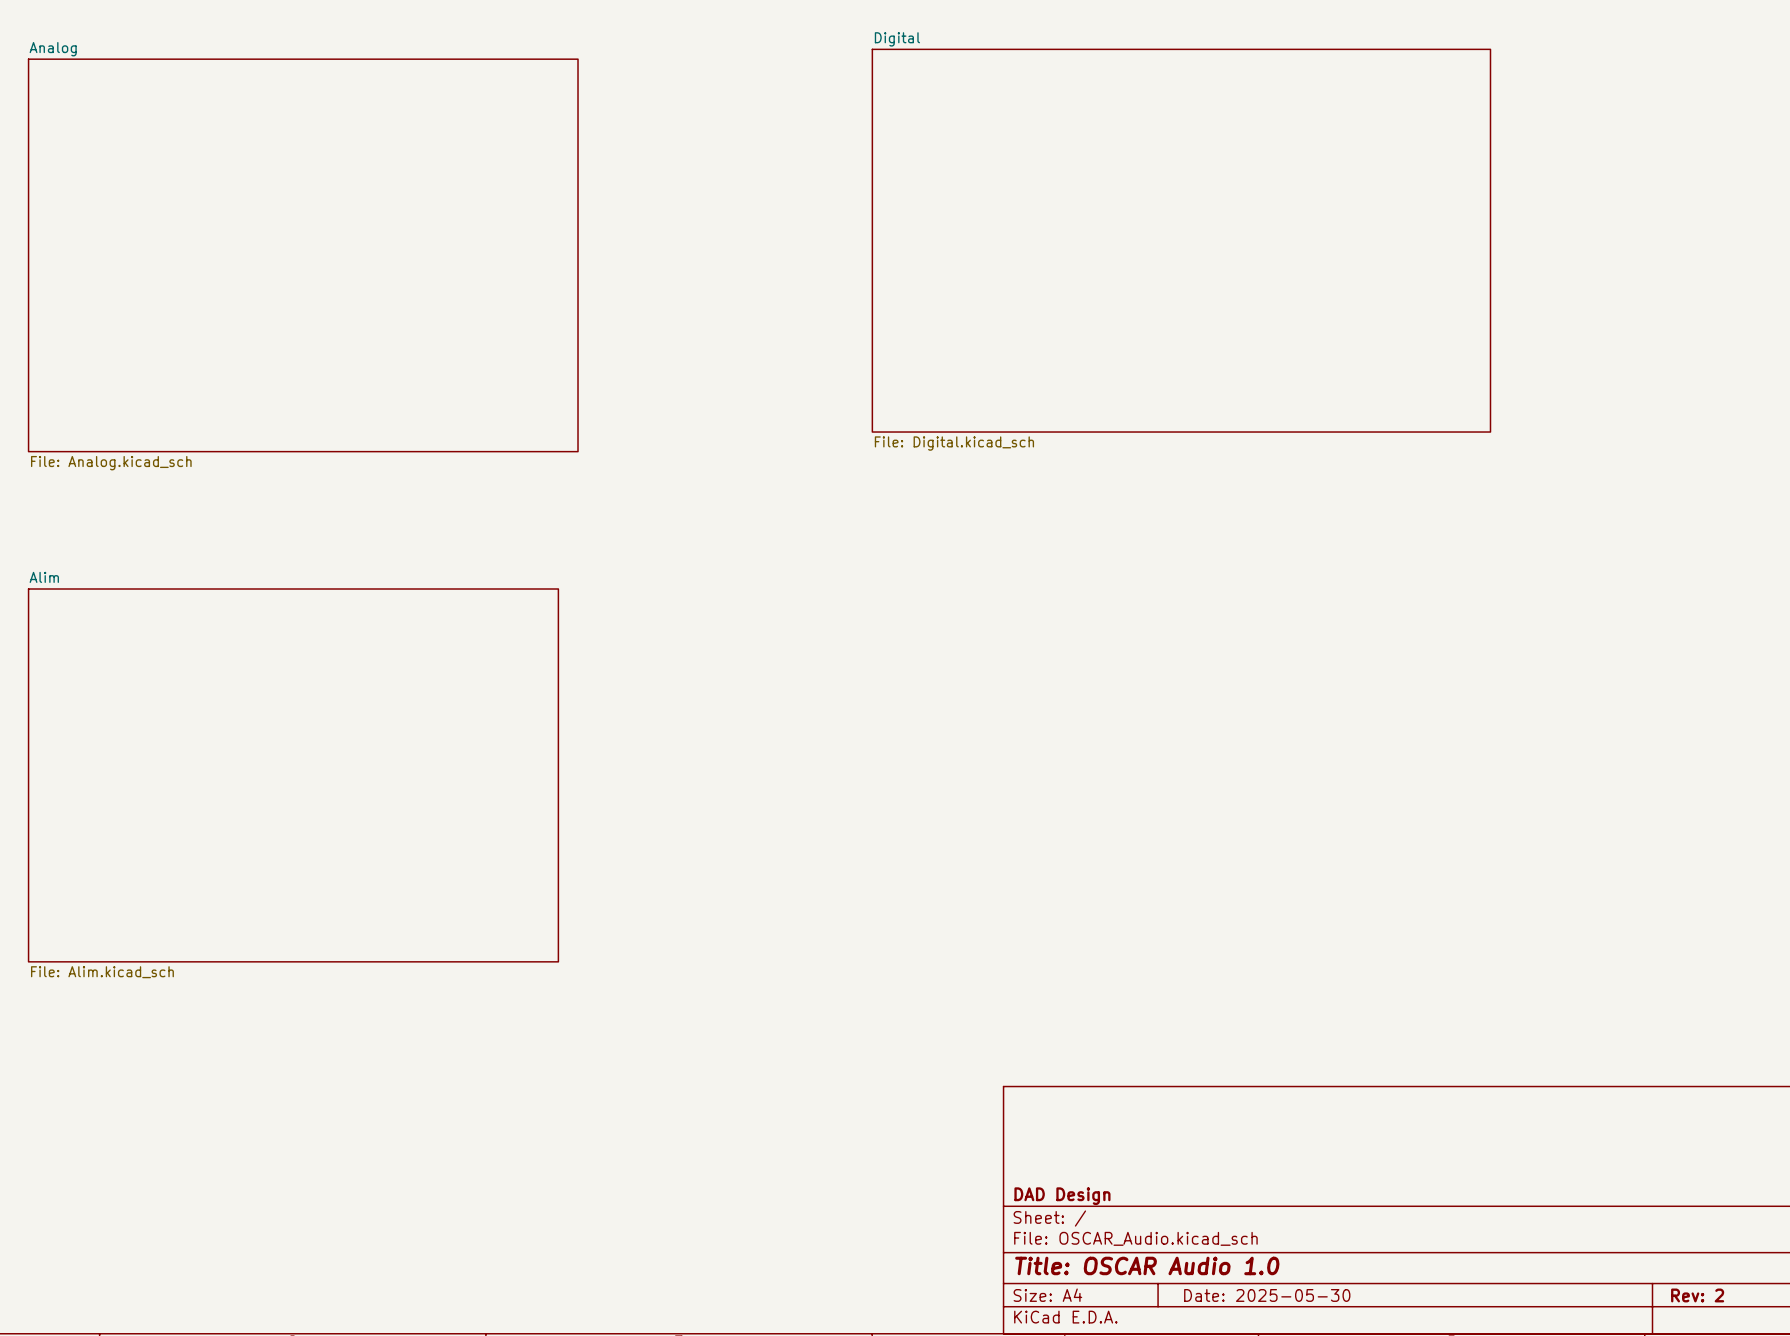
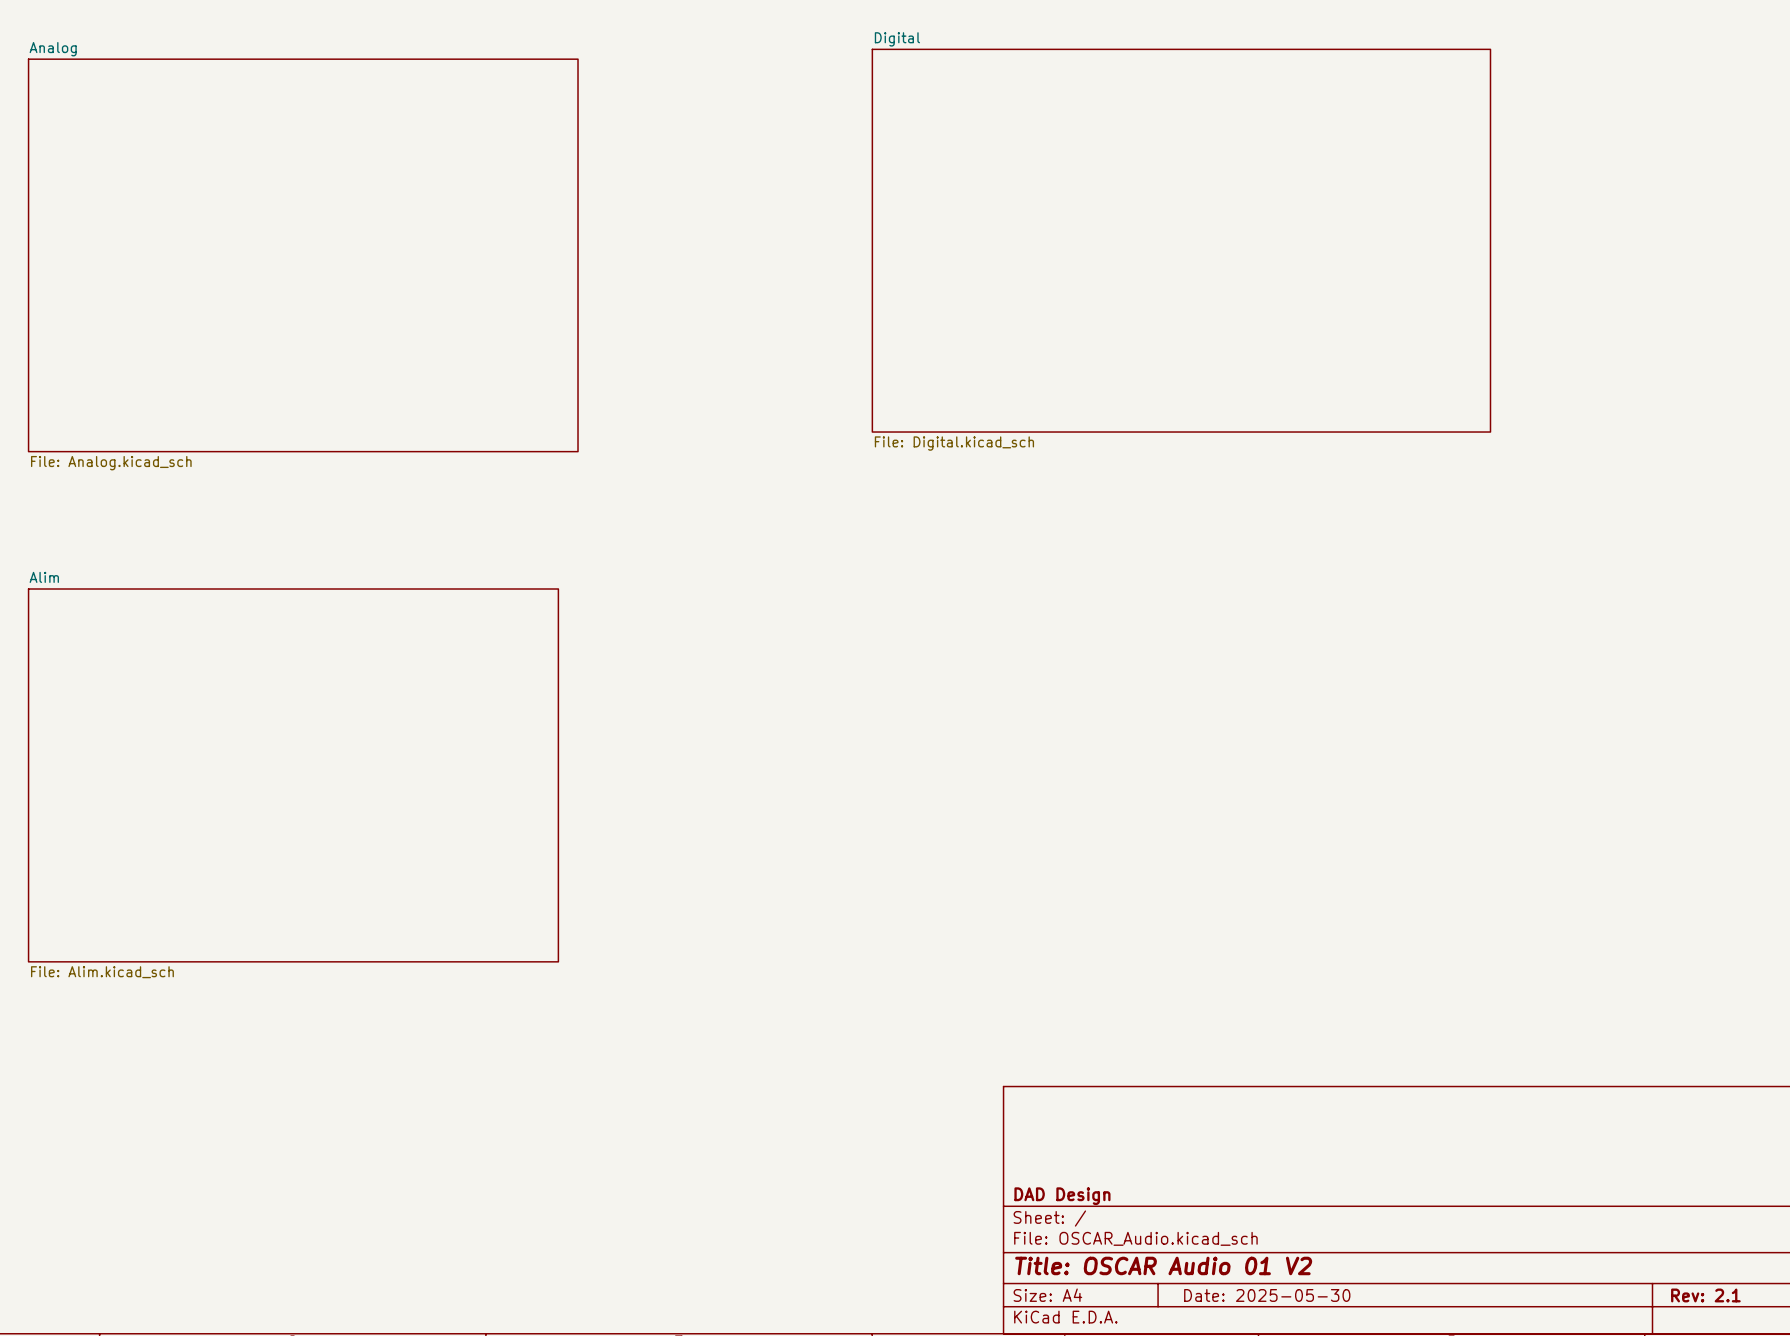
title block: Title: OSCAR Audio 1.0 (1147, 1265) -> Title: OSCAR Audio 01 V2 (1163, 1265)
title block: Rev: 2 (1697, 1295) -> Rev: 2.1 (1705, 1295)

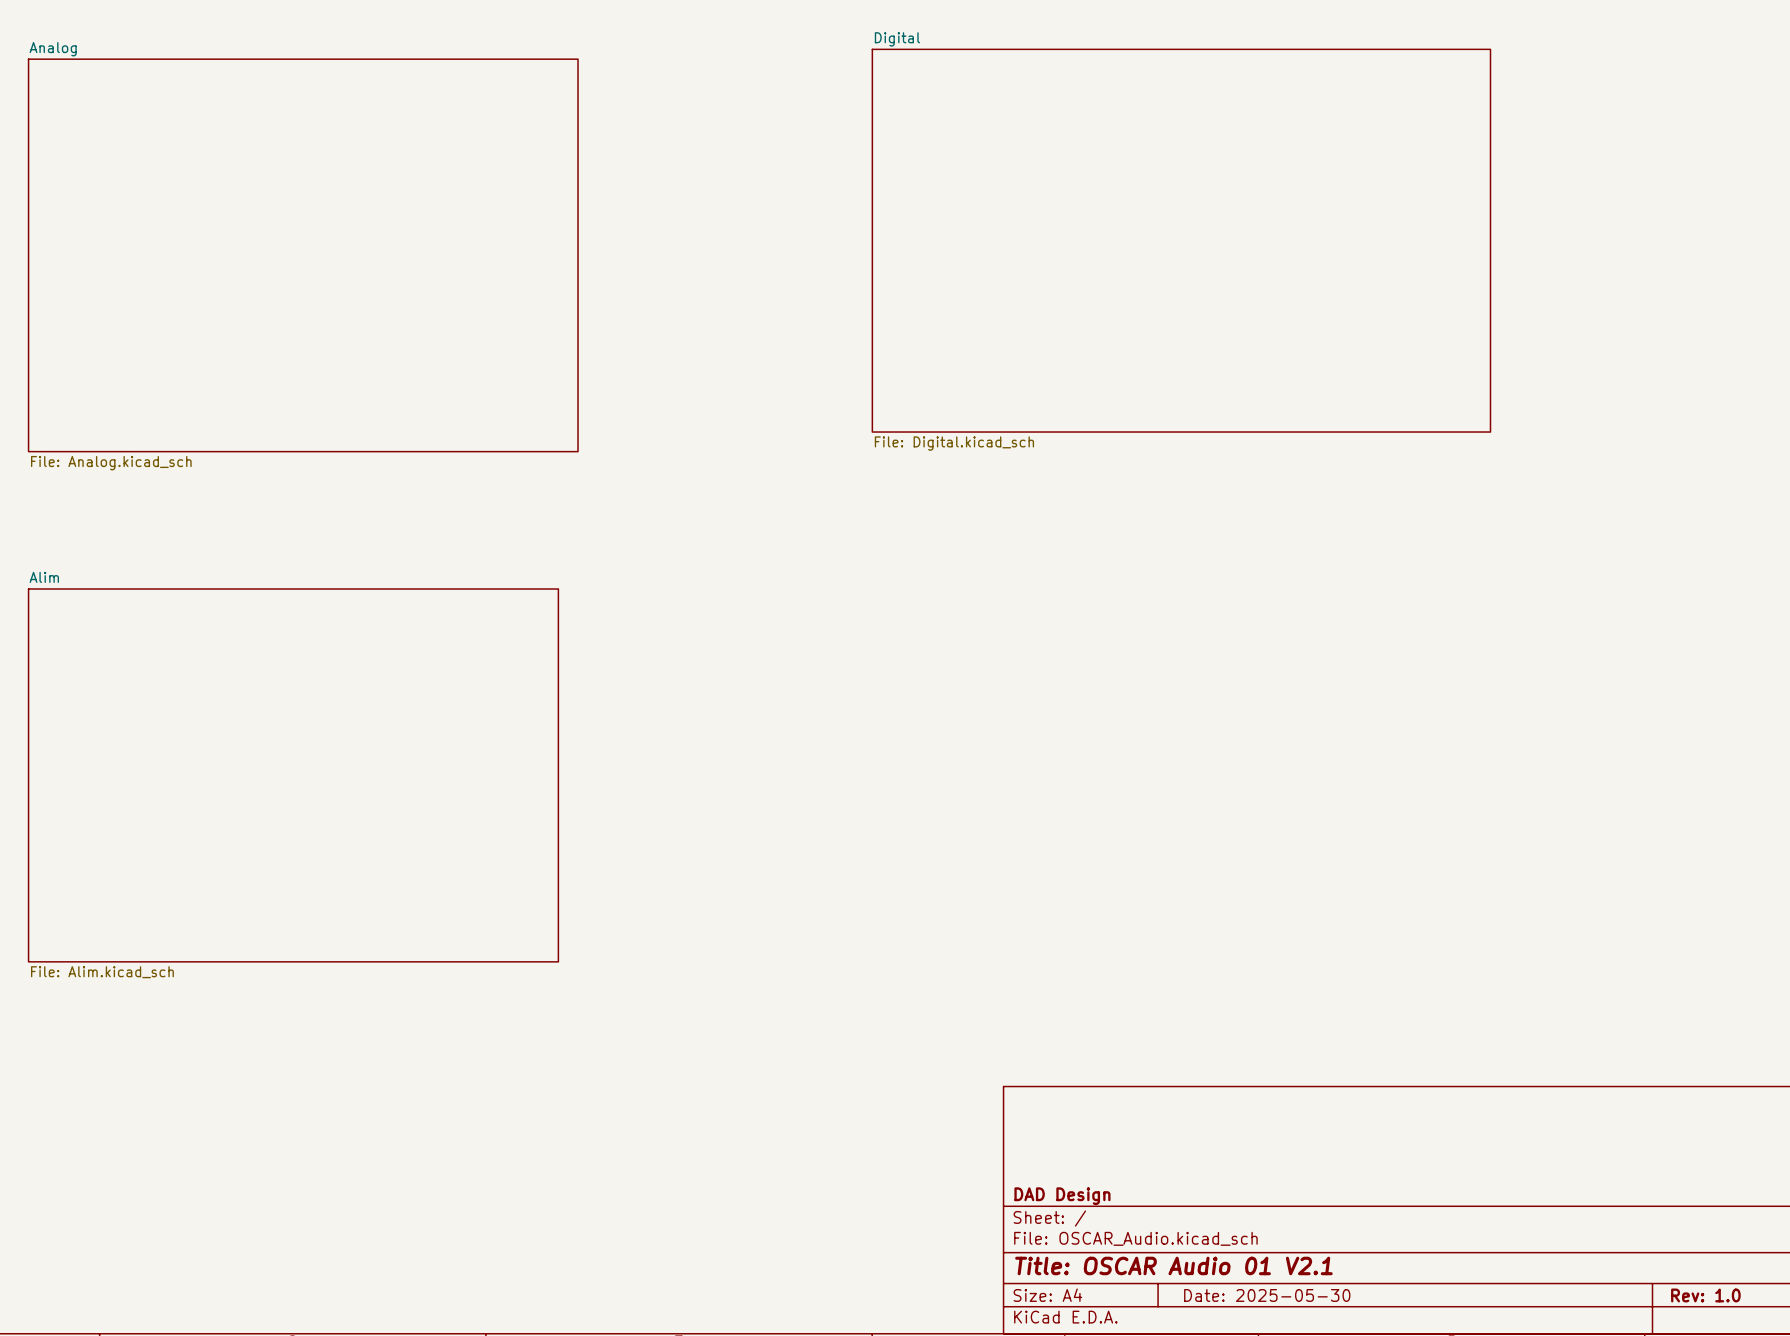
title block: Title: OSCAR Audio 01 V2 (1163, 1265) -> Title: OSCAR Audio 01 V2.1 (1173, 1265)
title block: Rev: 2.1 (1705, 1295) -> Rev: 1.0 (1705, 1295)

